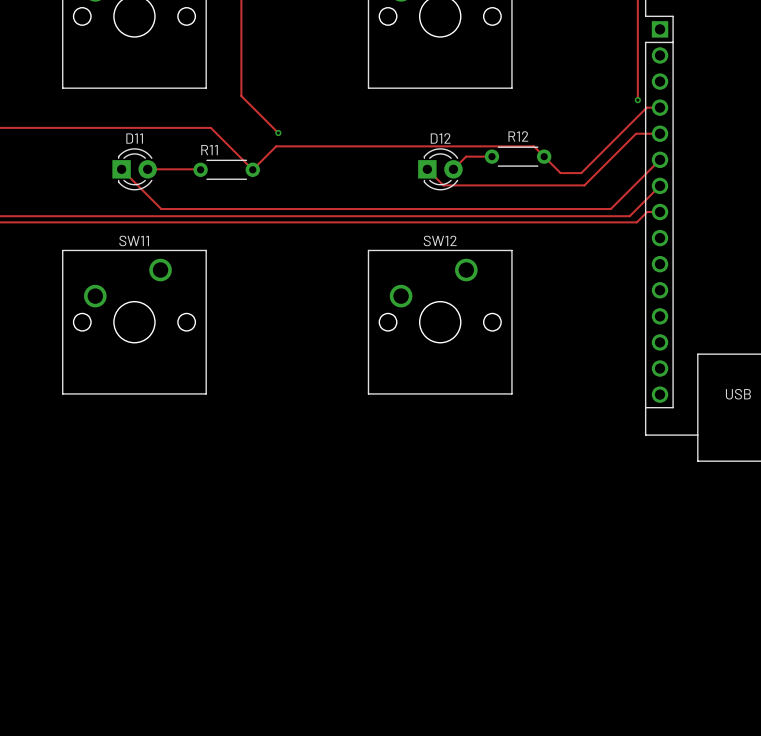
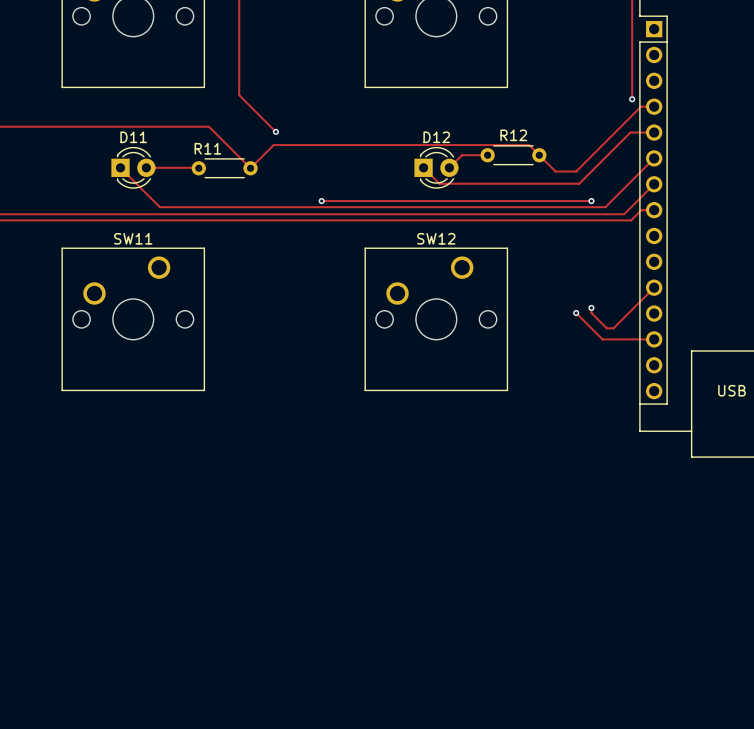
track: none -> (321, 201) (591, 201)
via: none -> (321, 201)
via: none -> (591, 201)
track: none -> (654, 287) (613, 328) (606, 328) (591, 313) (591, 307)
via: none -> (591, 307)
track: none -> (576, 313) (602, 339) (654, 339)
via: none -> (576, 313)

